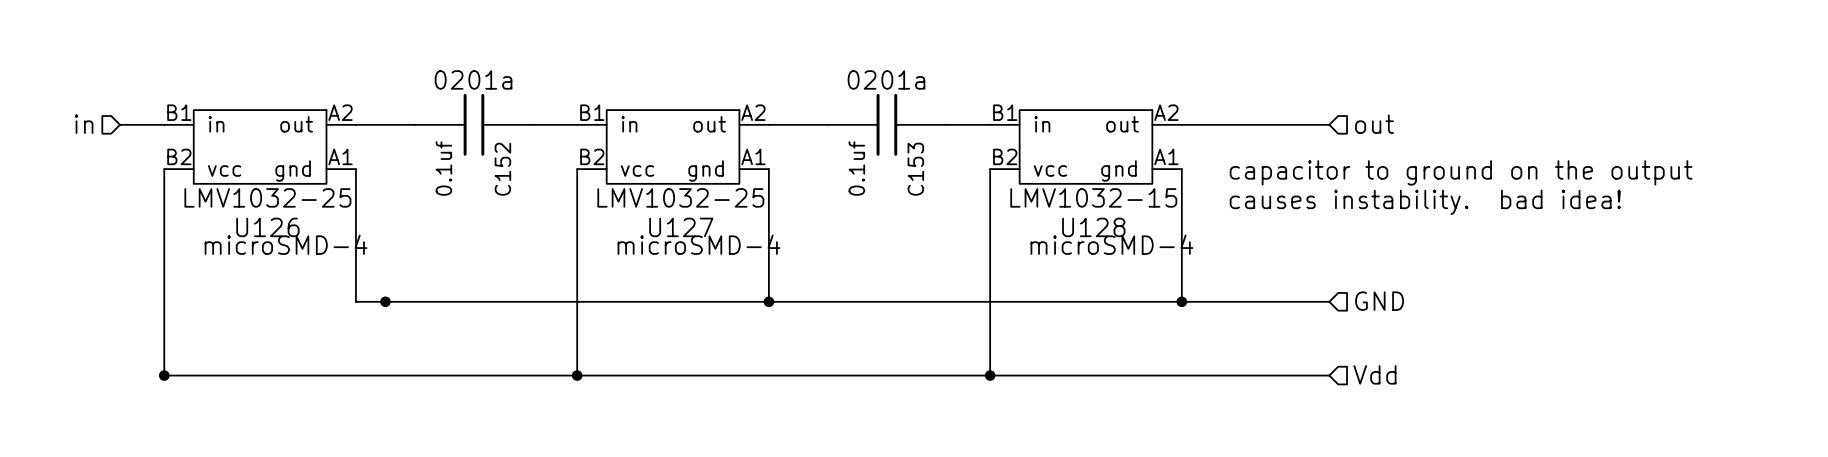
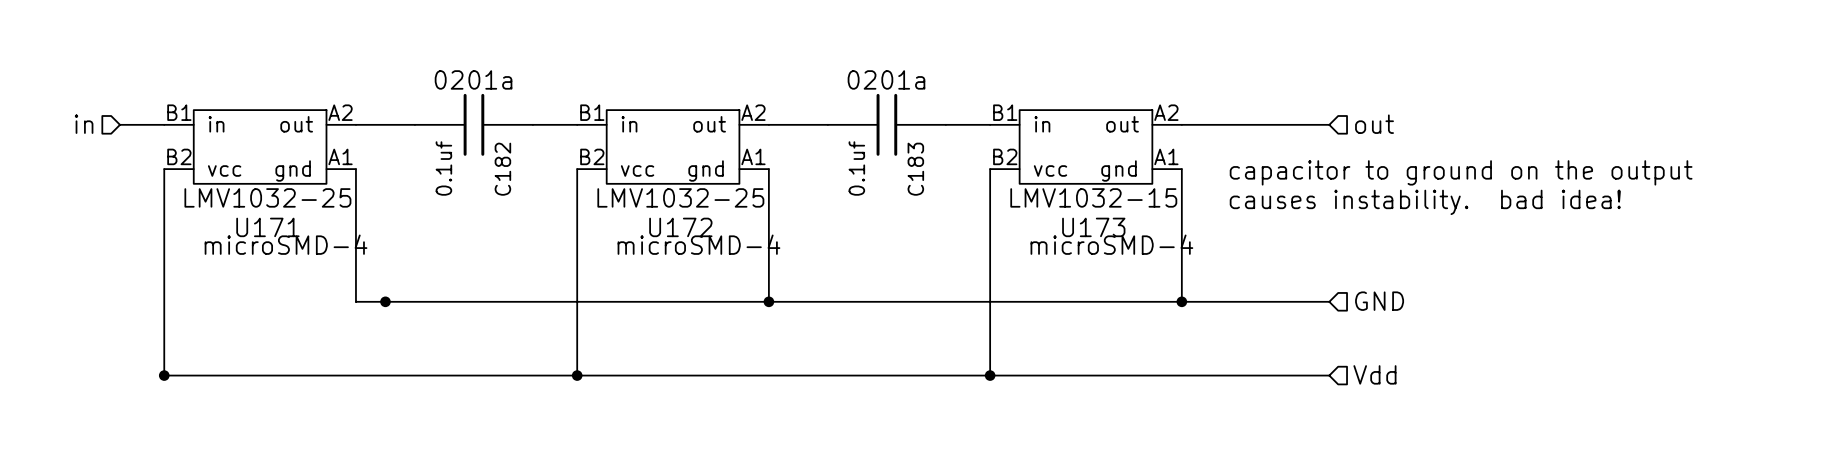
C152 name: C152 (502, 169) -> C182 (502, 169)
C153 name: C153 (915, 169) -> C183 (915, 169)
U126 name: U126 (267, 227) -> U171 (267, 227)
U127 name: U127 (681, 227) -> U172 (680, 227)
U128 name: U128 (1093, 227) -> U173 (1093, 227)

